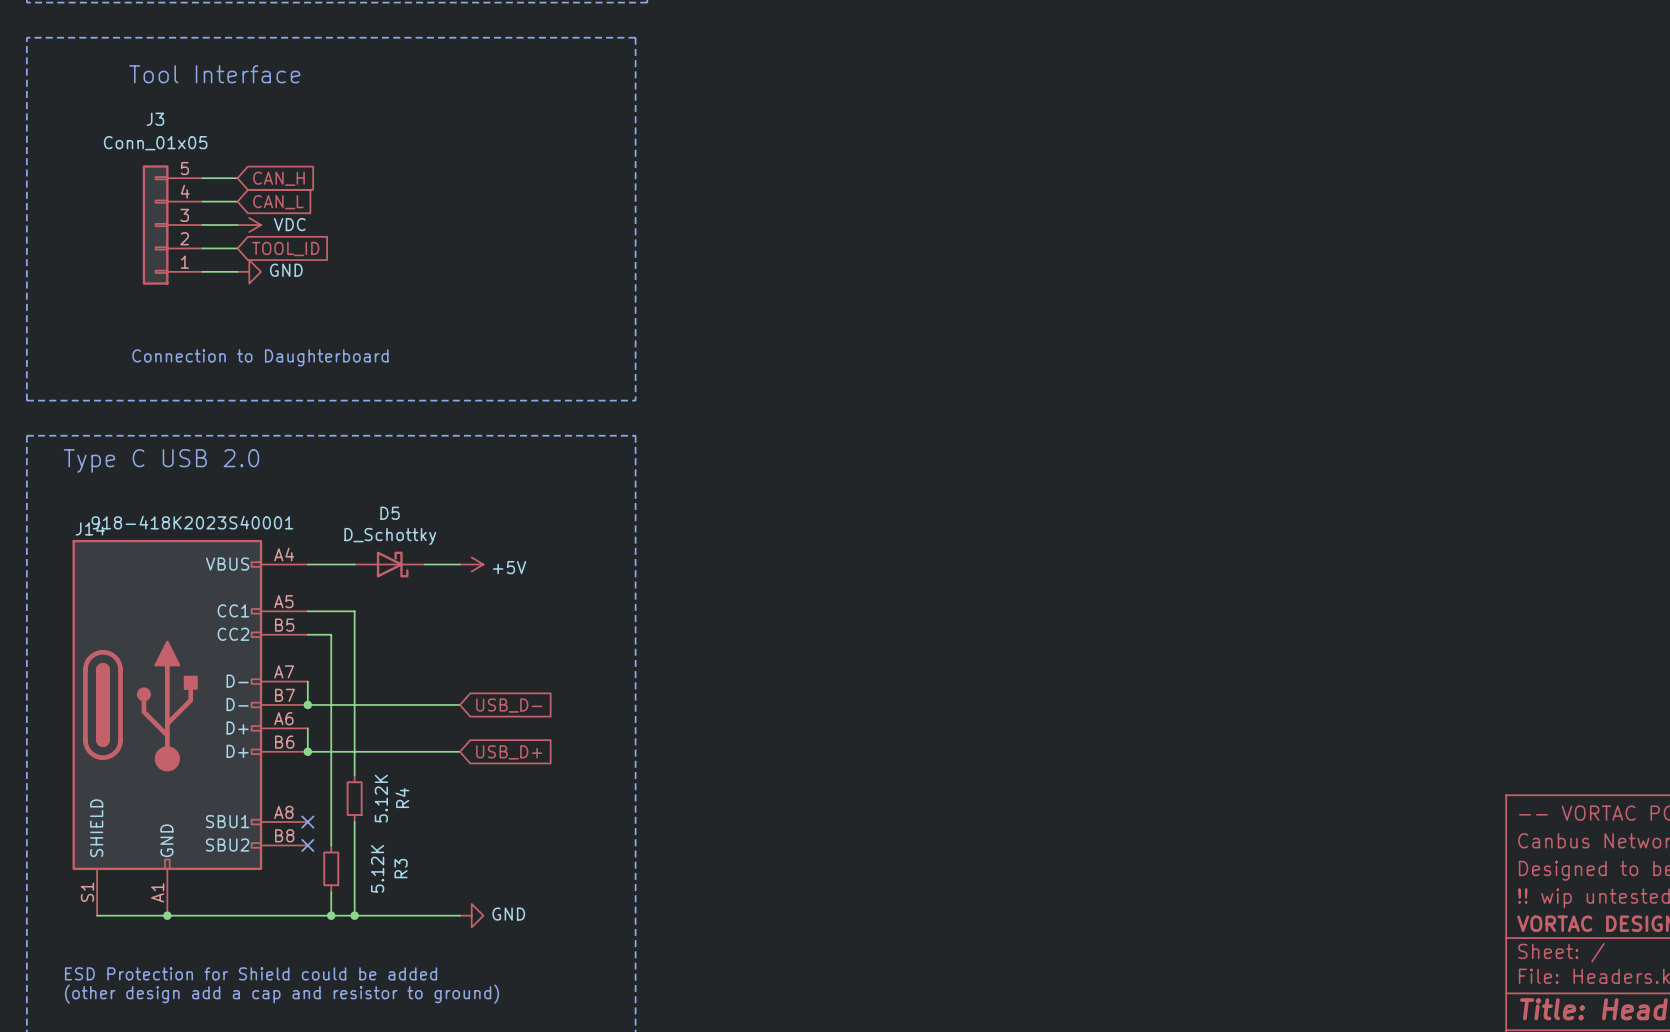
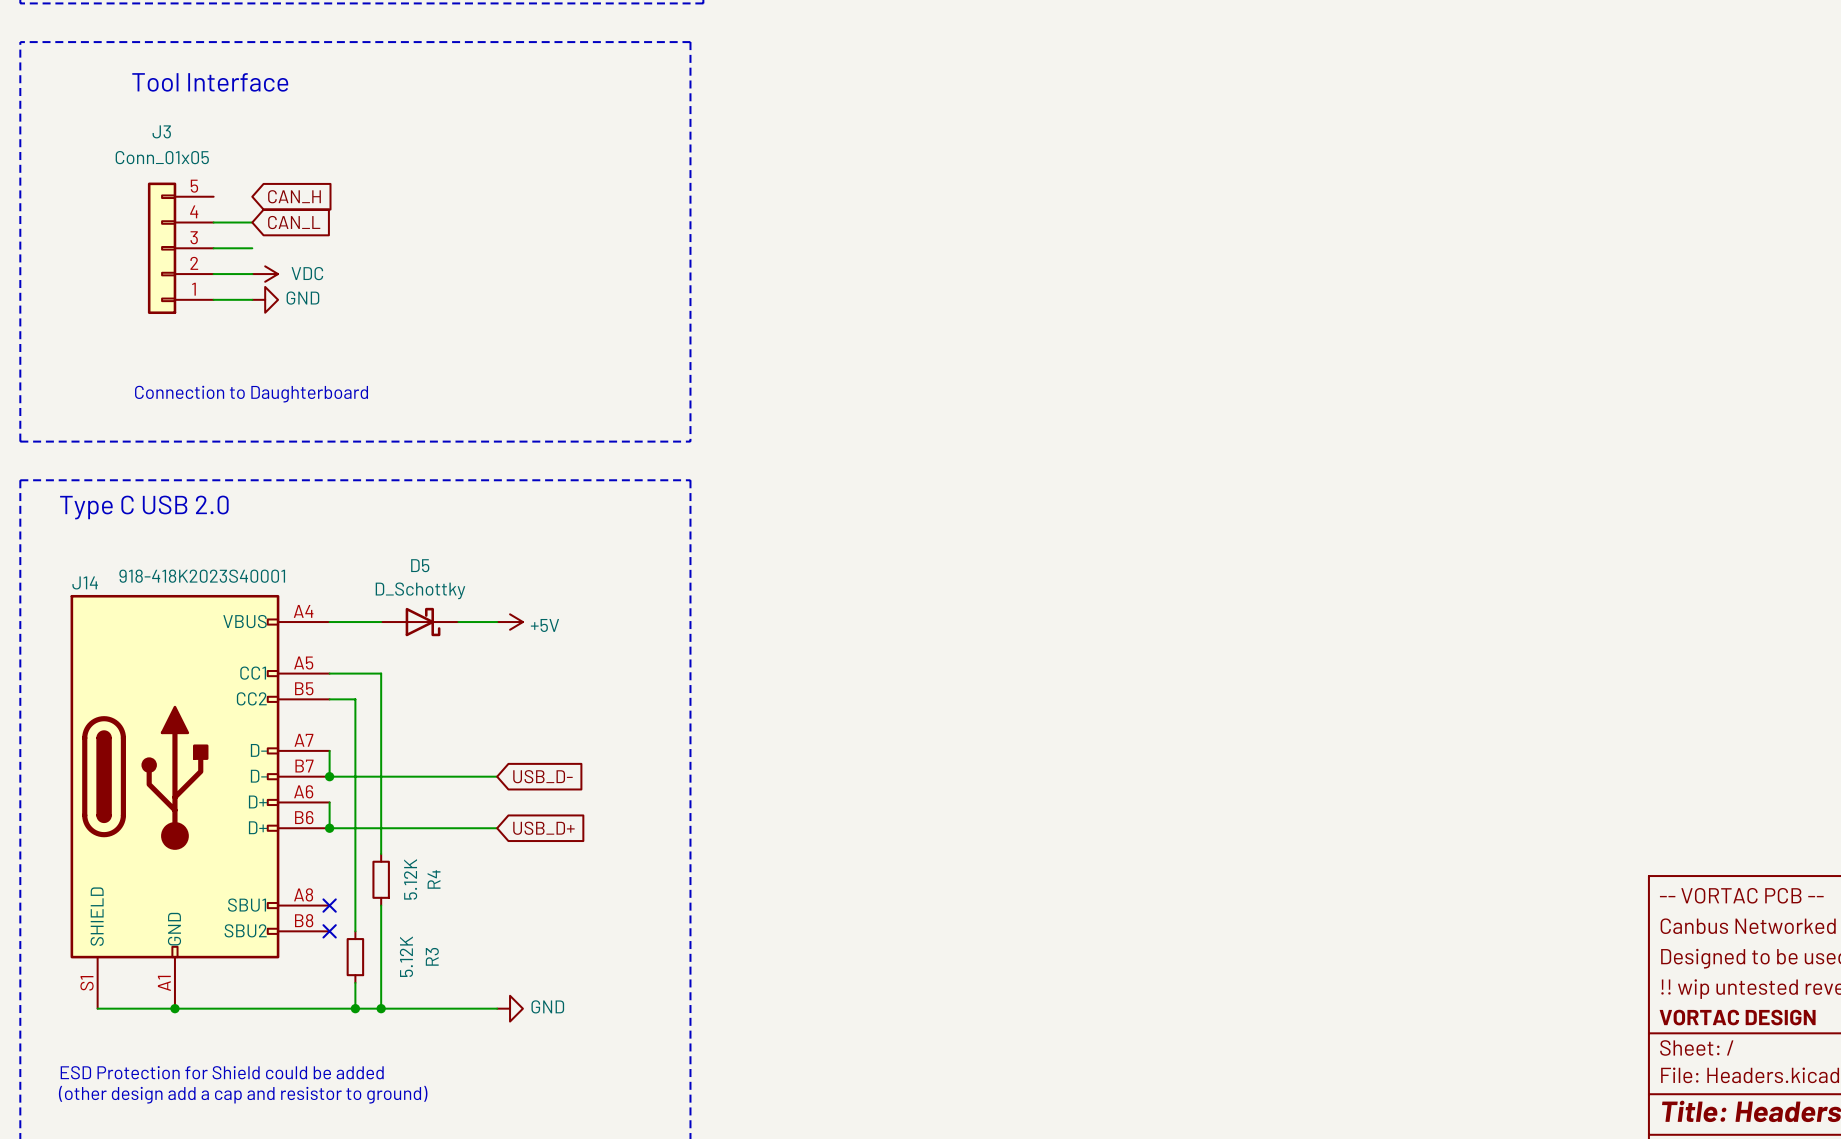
wire: (202, 178) (237, 178) -> none
power symbol position: VDC (249, 225) -> VDC (265, 274)
global label: TOOL_ID (285, 248) -> none

